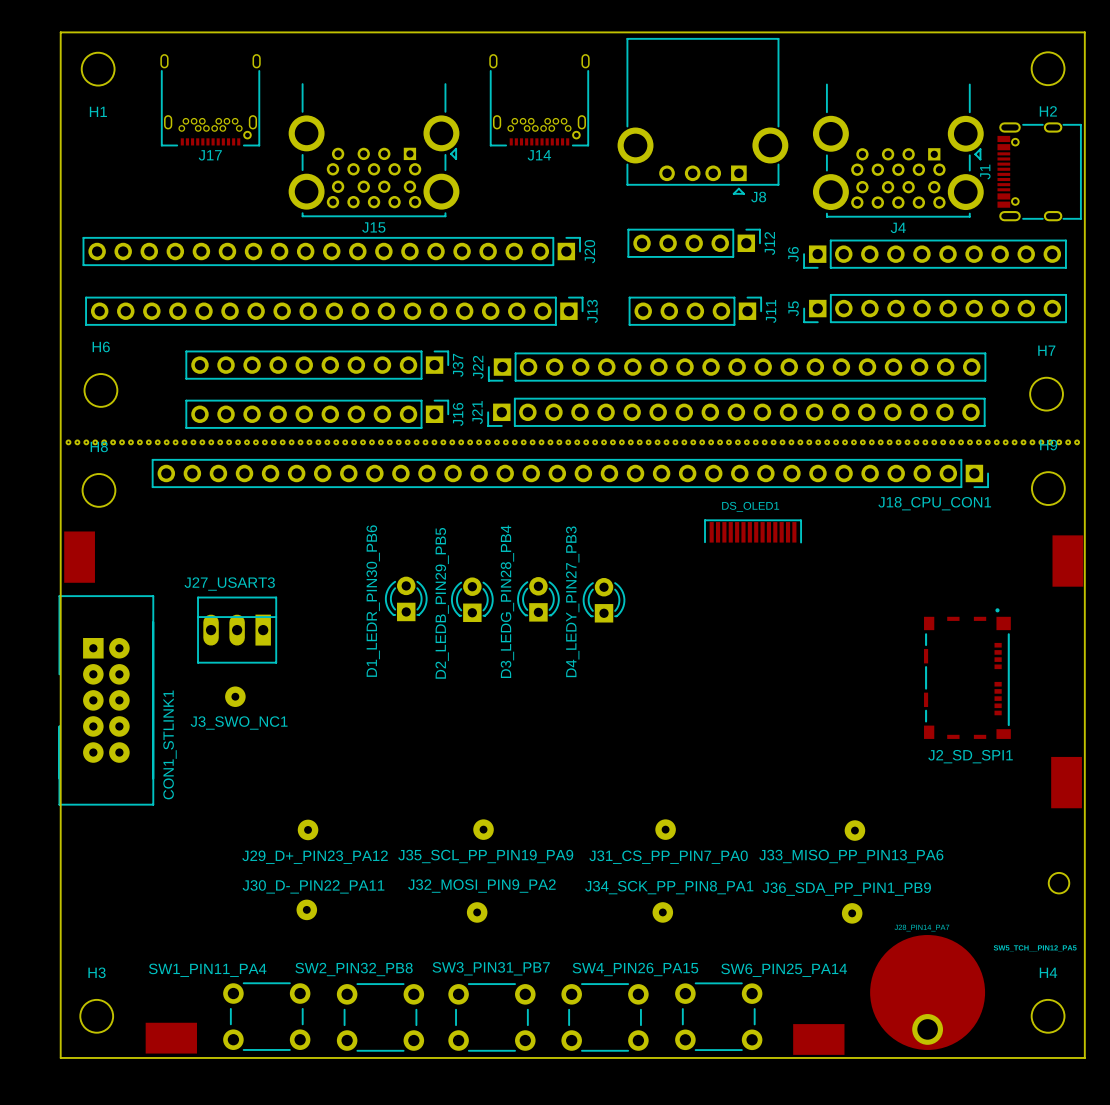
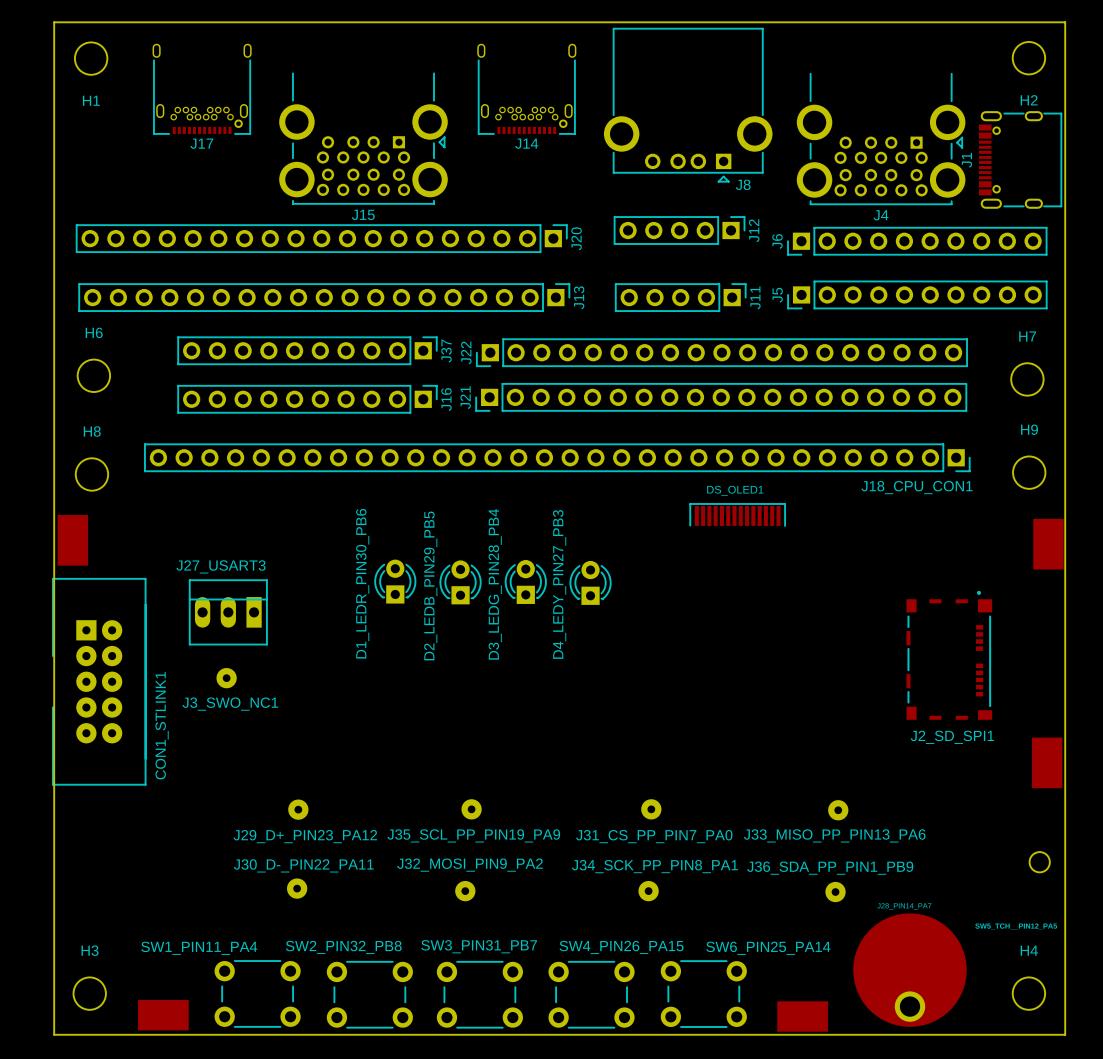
part: (68, 442) -> none
part: (77, 442) -> none
part: (86, 442) -> none
part: (95, 442) -> none
part: (104, 442) -> none
part: (113, 442) -> none
part: (122, 442) -> none
part: (130, 442) -> none
part: (139, 442) -> none
part: (148, 442) -> none
part: (157, 442) -> none
part: (166, 442) -> none
part: (175, 442) -> none
part: (184, 442) -> none
part: (193, 442) -> none
part: (202, 442) -> none
part: (211, 442) -> none
part: (220, 442) -> none
part: (229, 442) -> none
part: (238, 442) -> none
part: (247, 442) -> none
part: (255, 442) -> none
part: (264, 442) -> none
part: (273, 442) -> none
part: (282, 442) -> none
part: (291, 442) -> none
part: (300, 442) -> none
part: (309, 442) -> none
part: (318, 442) -> none
part: (327, 442) -> none
part: (336, 442) -> none
part: (345, 442) -> none
part: (354, 442) -> none
part: (363, 442) -> none
part: (371, 442) -> none
part: (380, 442) -> none
part: (389, 442) -> none
part: (398, 442) -> none
part: (407, 442) -> none
part: (416, 442) -> none
part: (425, 442) -> none
part: (434, 442) -> none
part: (443, 442) -> none
part: (452, 442) -> none
part: (461, 442) -> none
part: (470, 442) -> none
part: (479, 442) -> none
part: (487, 442) -> none
part: (496, 442) -> none
part: (505, 442) -> none
part: (514, 442) -> none
part: (523, 442) -> none
part: (532, 442) -> none
part: (541, 442) -> none
part: (550, 442) -> none
part: (559, 442) -> none
part: (568, 442) -> none
part: (577, 442) -> none
part: (586, 442) -> none
part: (595, 442) -> none
part: (604, 442) -> none
part: (612, 442) -> none
part: (621, 442) -> none
part: (630, 442) -> none
part: (639, 442) -> none
part: (648, 442) -> none
part: (657, 442) -> none
part: (666, 442) -> none
part: (675, 442) -> none
part: (684, 442) -> none
part: (693, 442) -> none
part: (702, 442) -> none
part: (711, 442) -> none
part: (720, 442) -> none
part: (728, 442) -> none
part: (737, 442) -> none
part: (746, 442) -> none
part: (755, 442) -> none
part: (764, 442) -> none
part: (773, 442) -> none
part: (782, 442) -> none
part: (791, 442) -> none
part: (800, 442) -> none
part: (809, 442) -> none
part: (818, 442) -> none
part: (827, 442) -> none
part: (836, 442) -> none
part: (845, 442) -> none
part: (853, 442) -> none
part: (862, 442) -> none
part: (871, 442) -> none
part: (880, 442) -> none
part: (889, 442) -> none
part: (898, 442) -> none
part: (907, 442) -> none
part: (916, 442) -> none
part: (925, 442) -> none
part: (934, 442) -> none
part: (943, 442) -> none
part: (952, 442) -> none
part: (961, 442) -> none
part: (969, 442) -> none
part: (978, 442) -> none
part: (987, 442) -> none
part: (996, 442) -> none
part: (1005, 442) -> none
part: (1014, 442) -> none
part: (1023, 442) -> none
part: (1032, 442) -> none
part: (1041, 442) -> none
part: (1050, 442) -> none
part: (1059, 442) -> none
part: (1068, 442) -> none
part: (1077, 442) -> none

